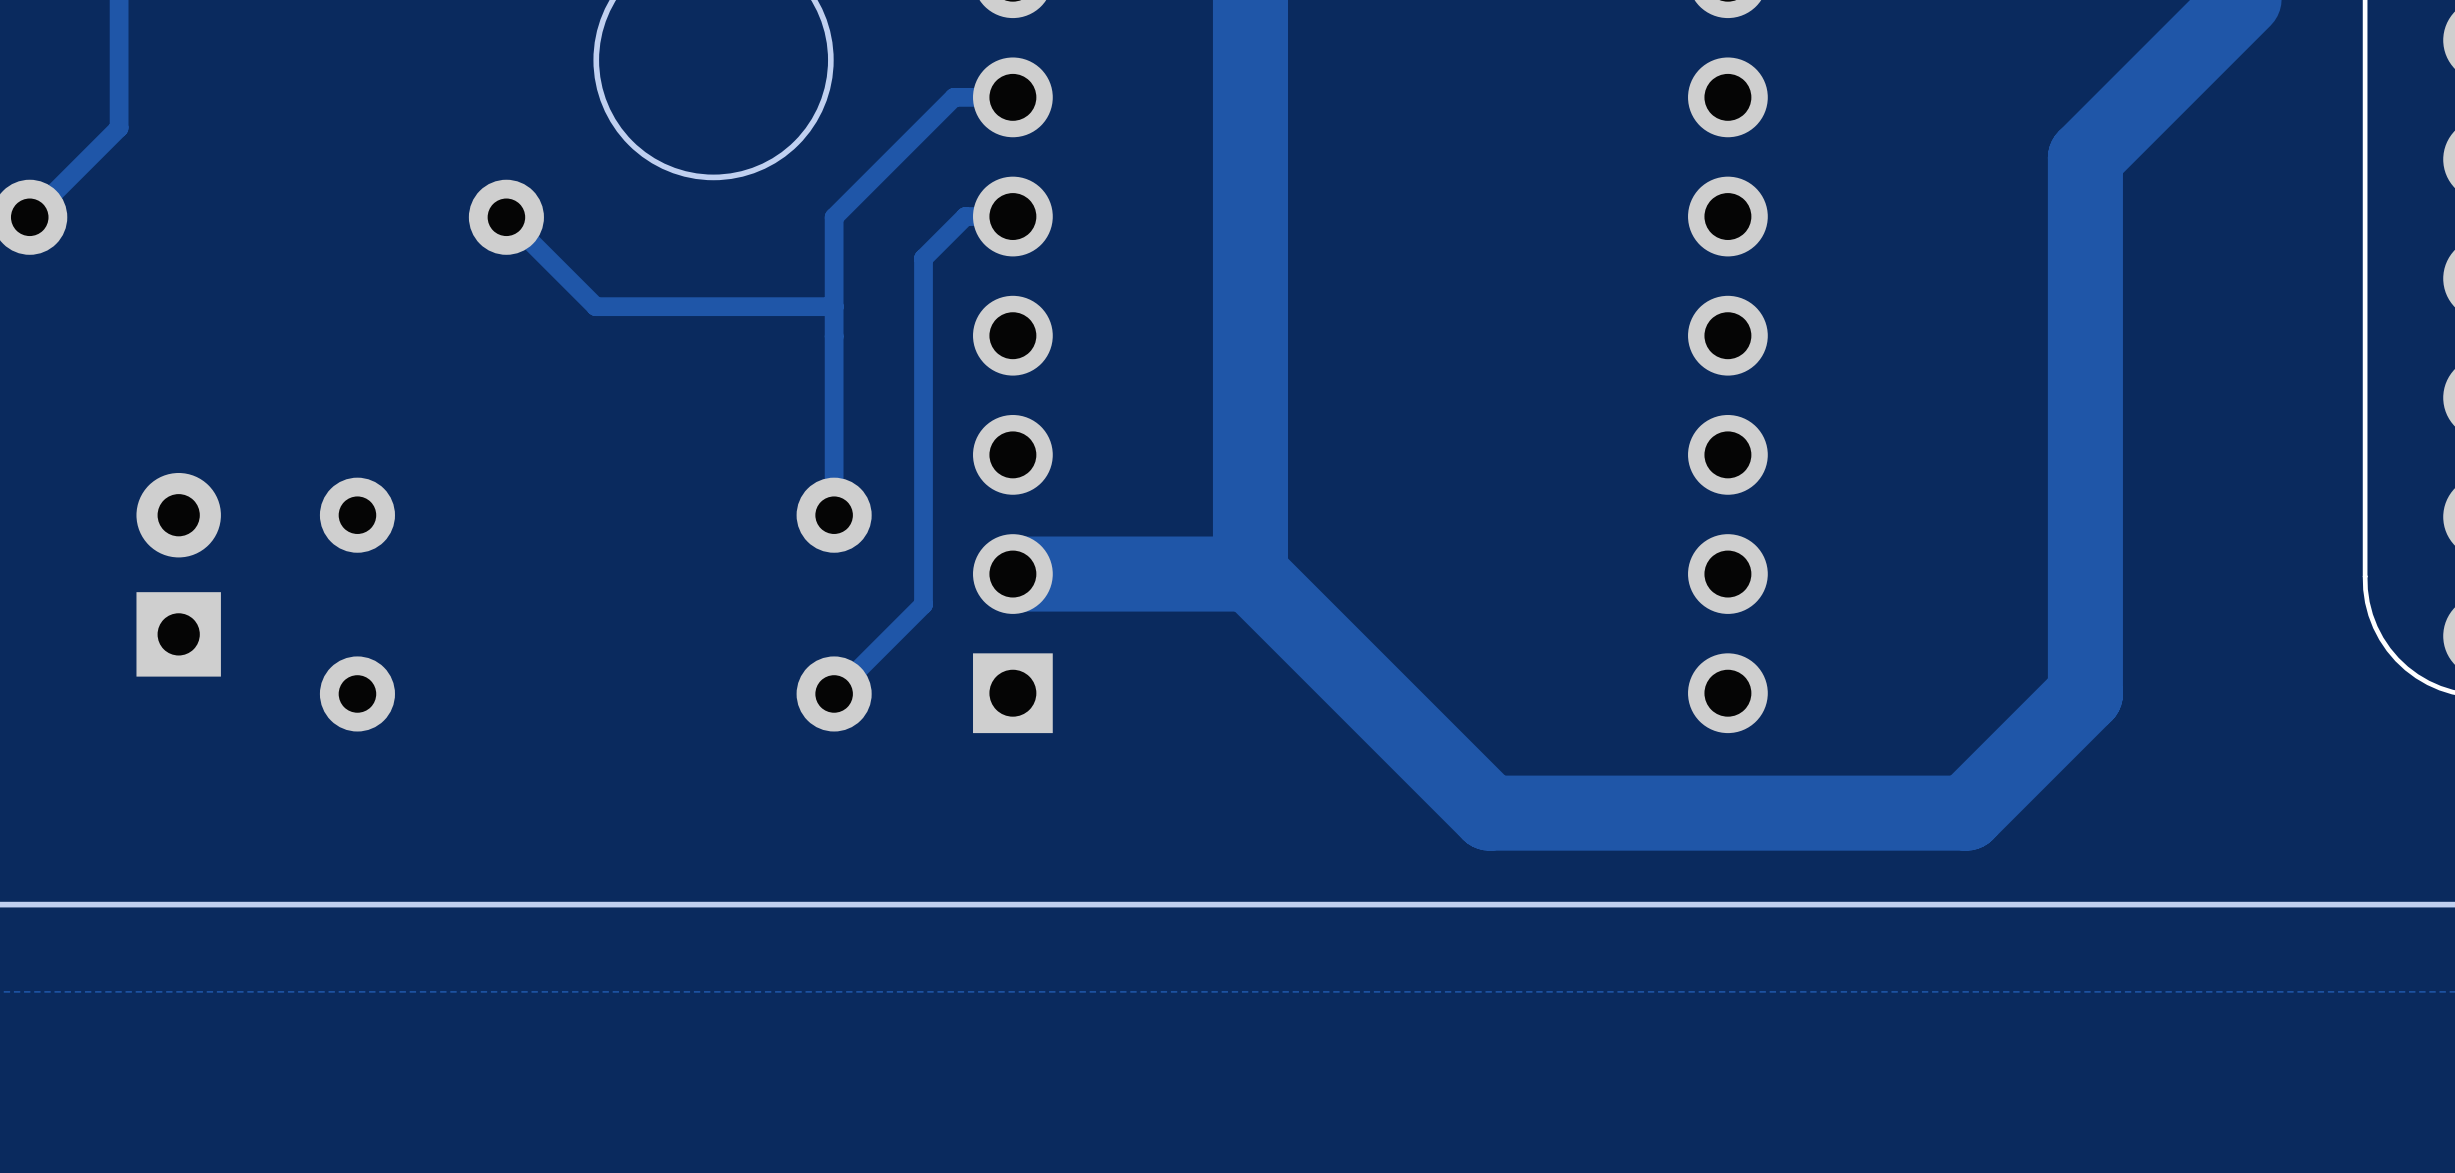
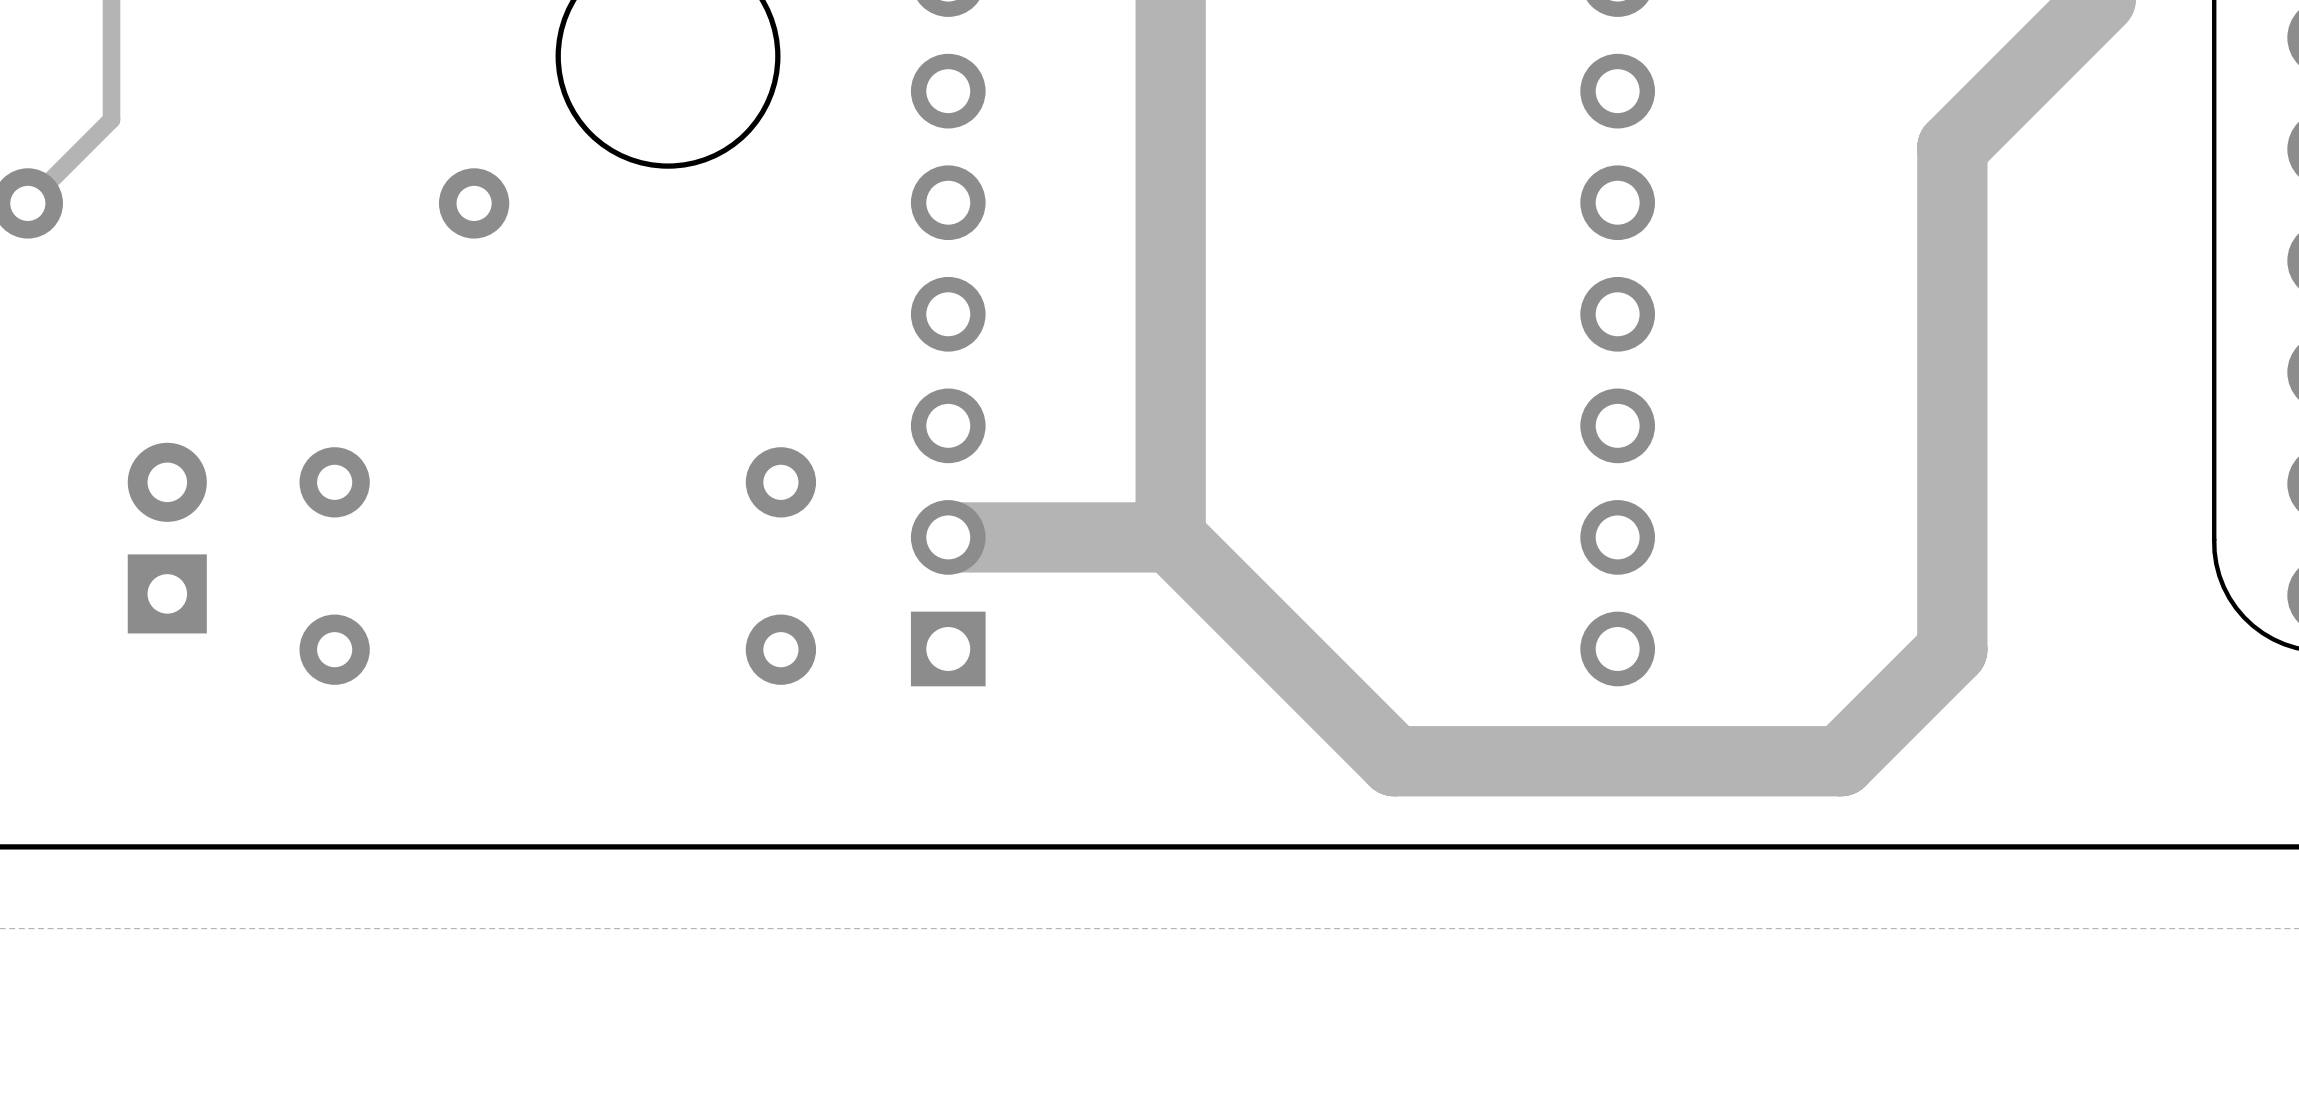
track: (1012, 97) (954, 97) (834, 217) (834, 515) -> none
track: (1012, 216) (965, 216) (923, 258) (923, 604) (834, 693) -> none
track: (506, 217) (595, 306) (834, 306) -> none

